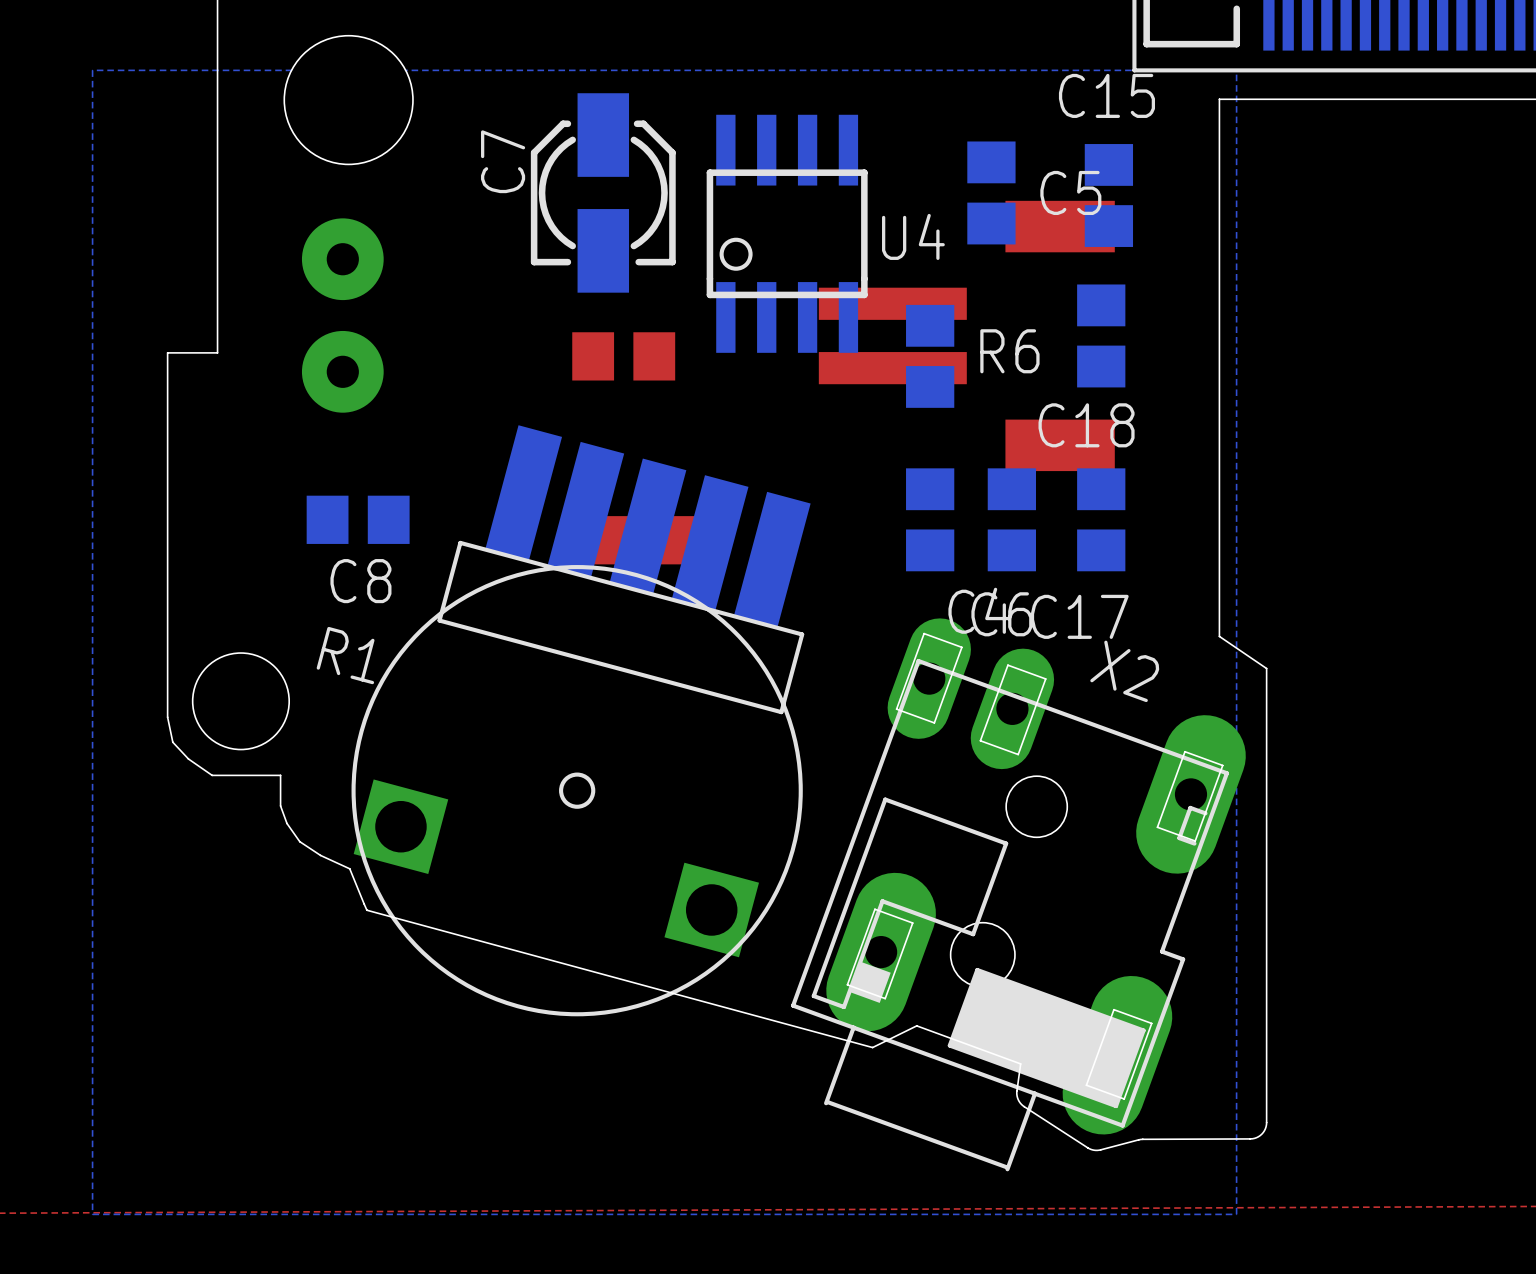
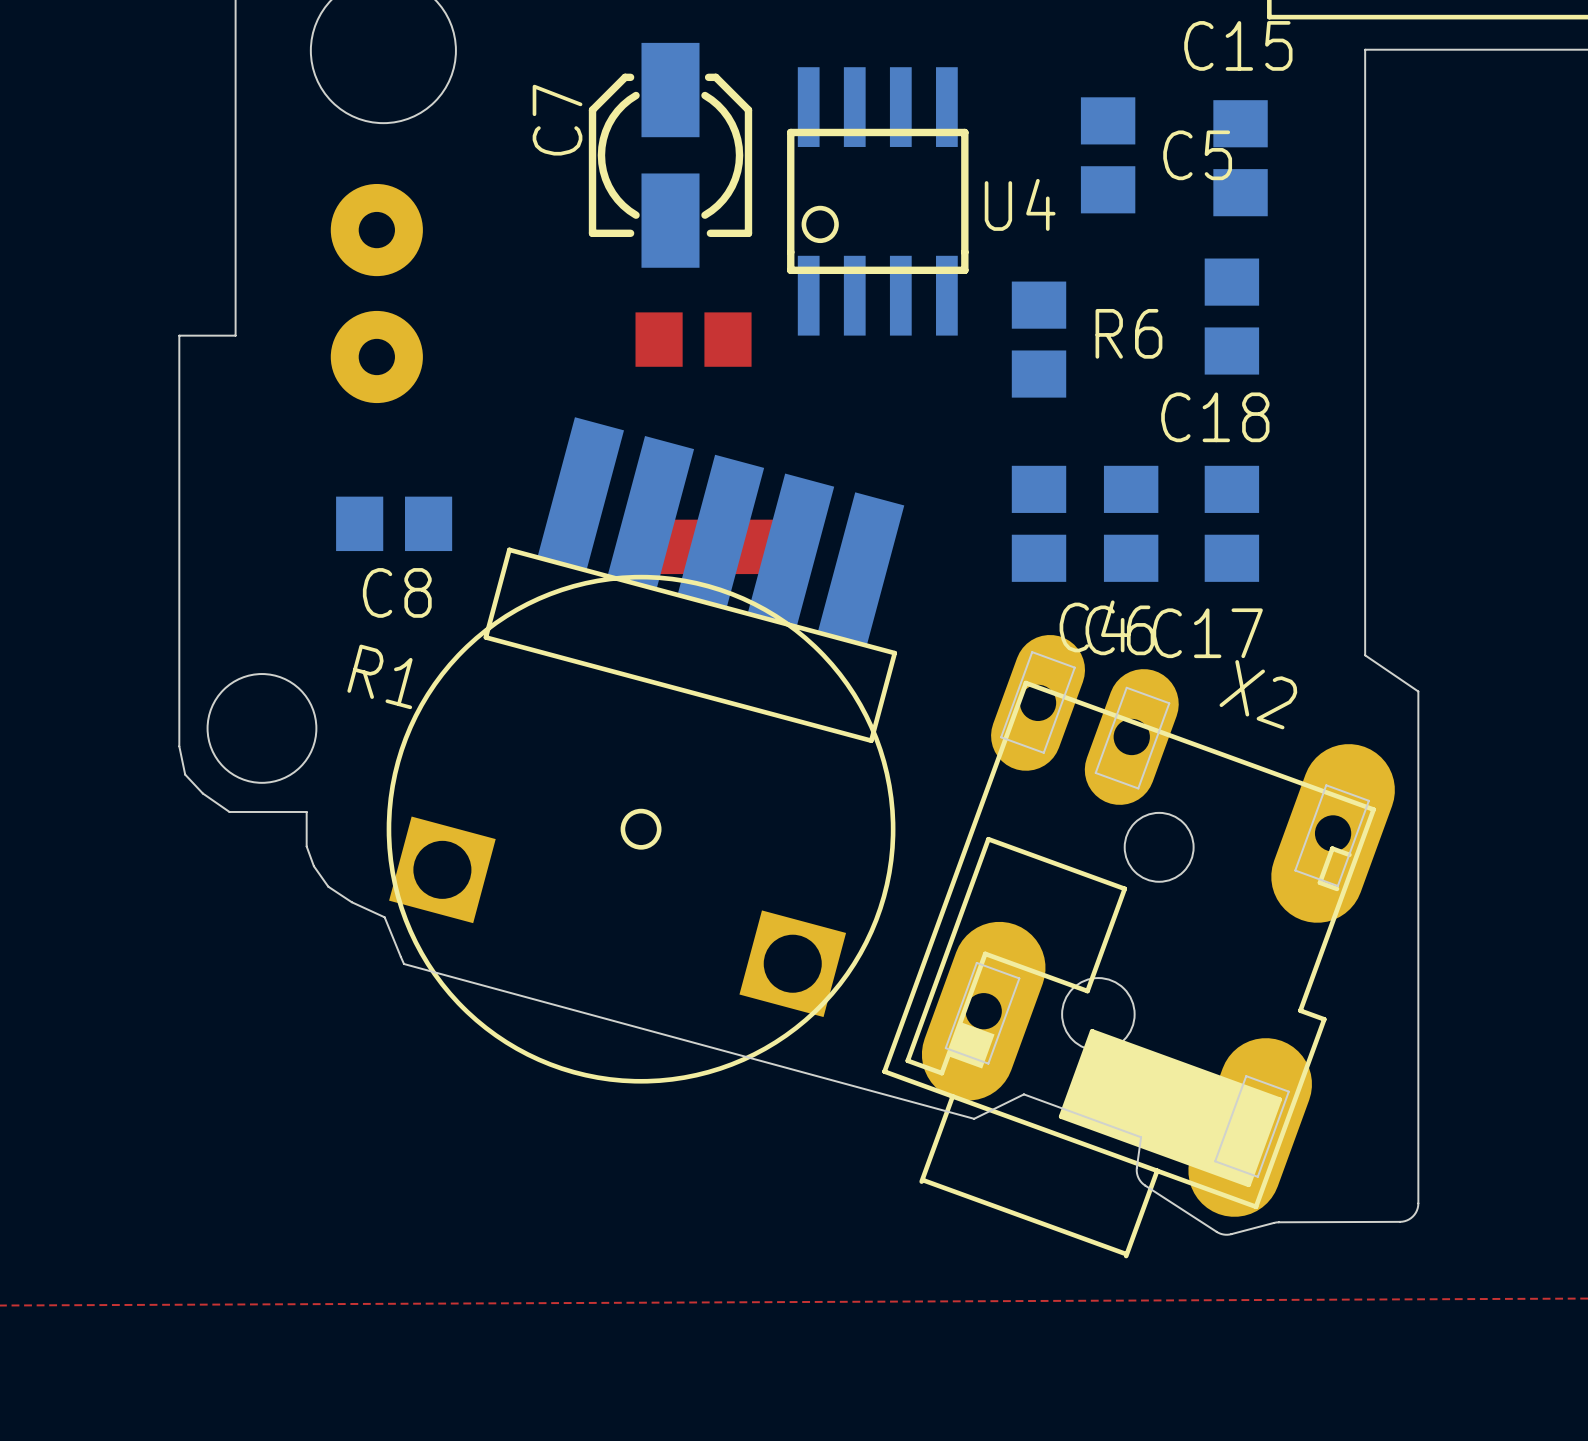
bottom zone outline: (1236, 70) (1236, 1214) (92, 1214) (92, 70) (1236, 70) -> none
part: (966, 335) -> none

